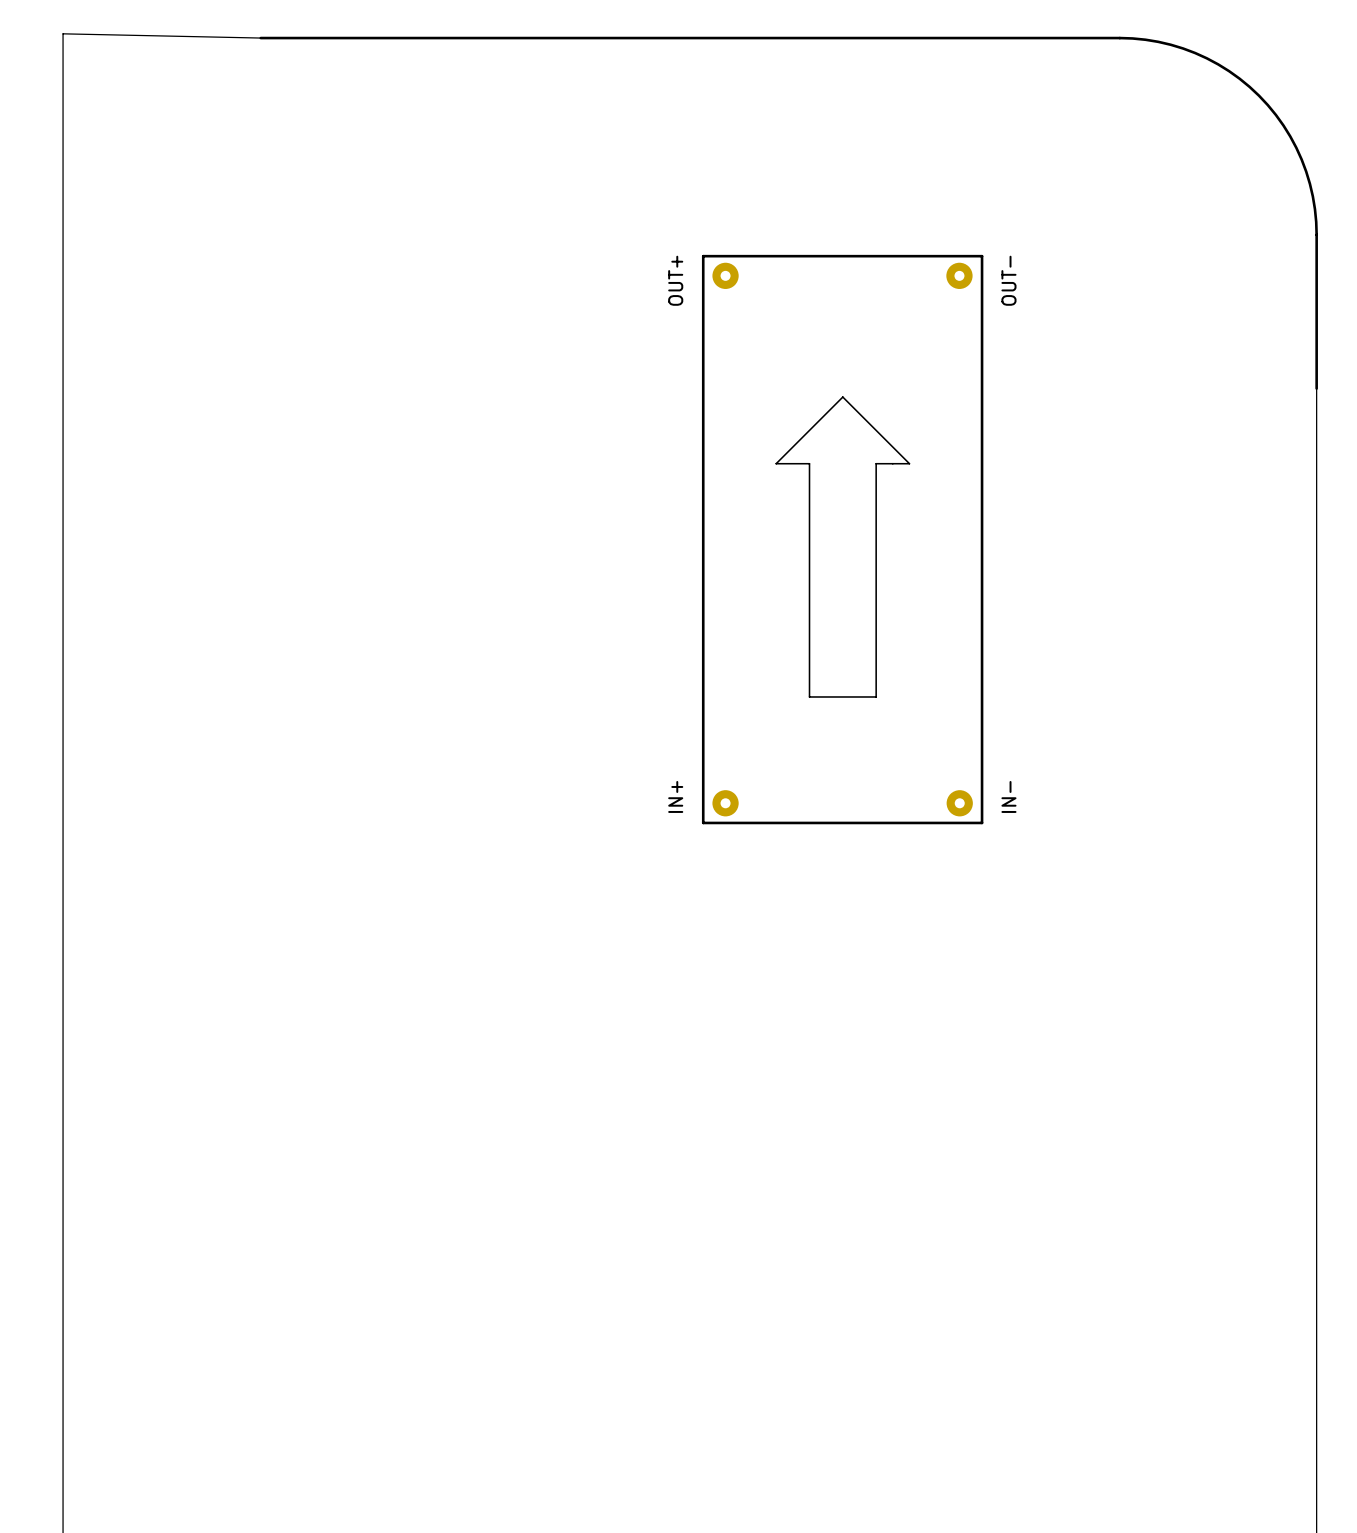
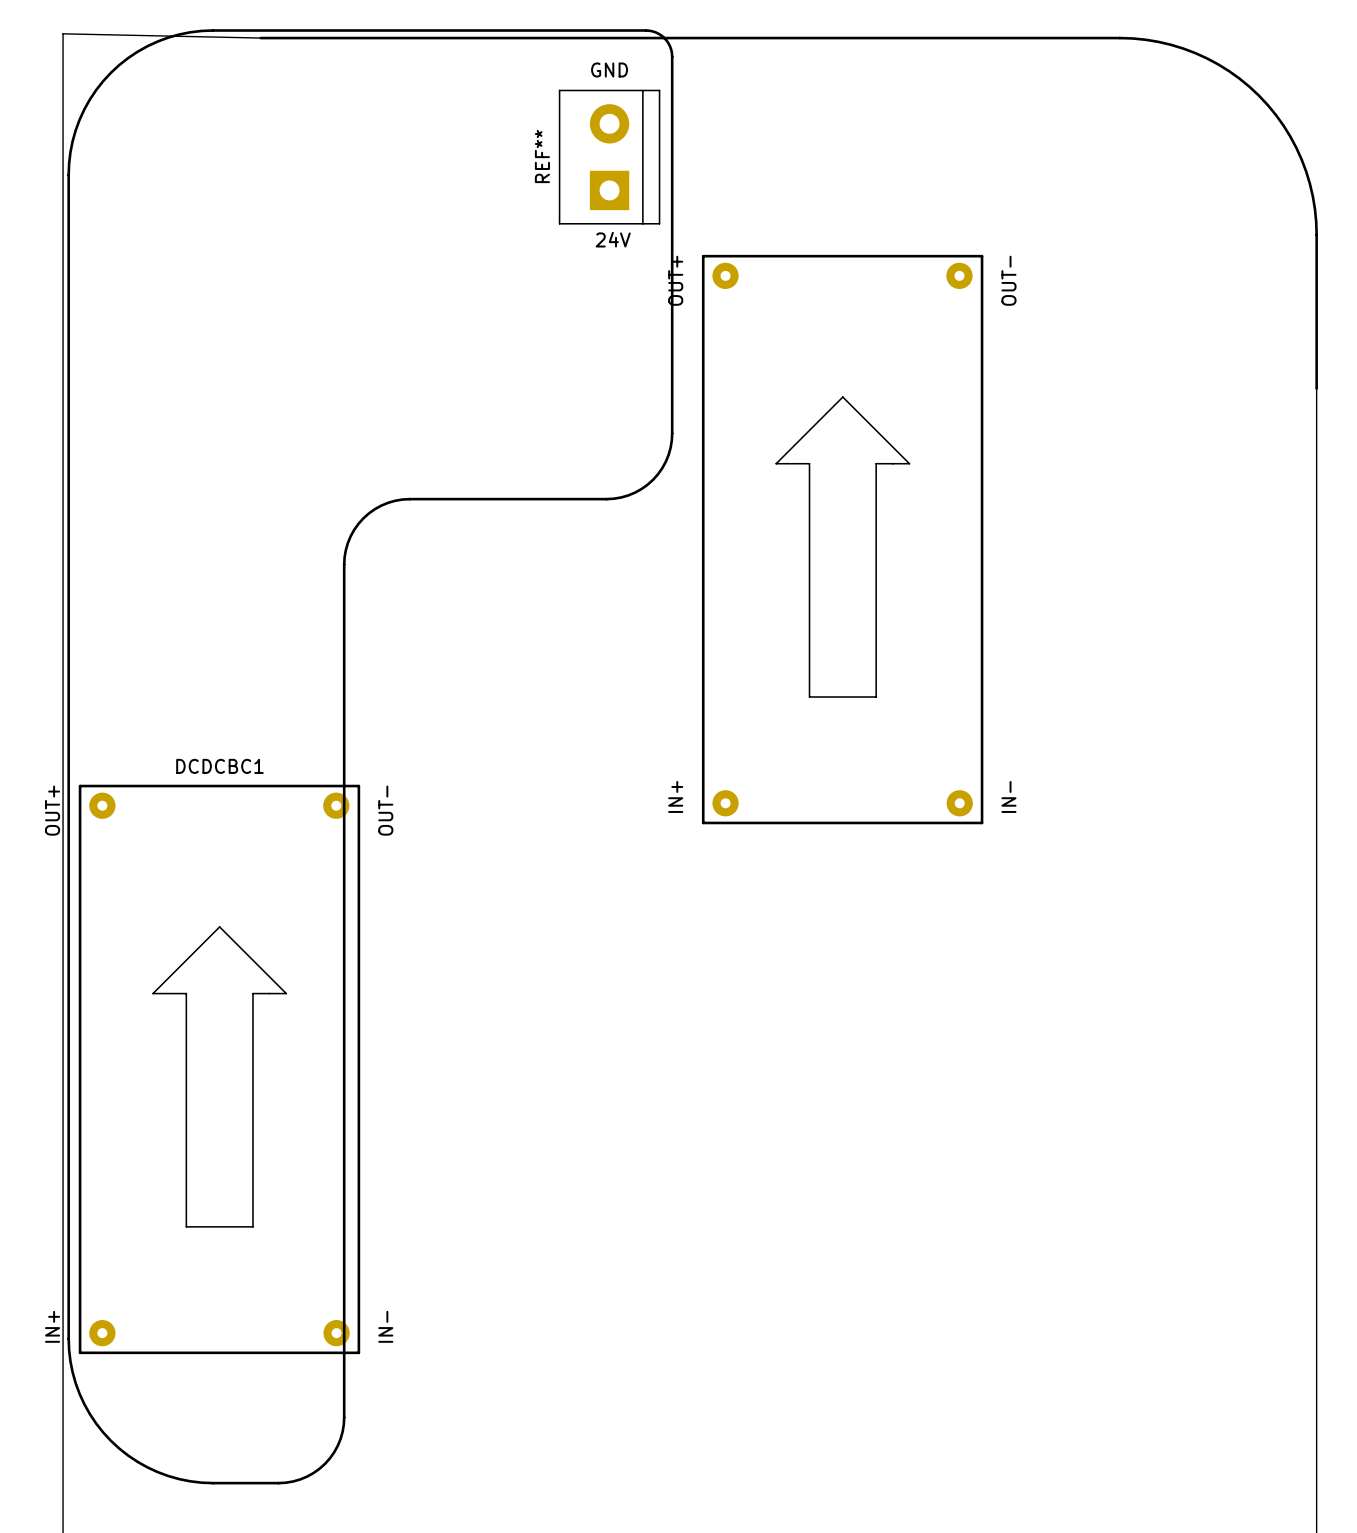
board edge: none -> (212, 30) (645, 30) (655, 32) (664, 38) (670, 46) (672, 56) (672, 433) (670, 448) (662, 468) (652, 479) (641, 489) (628, 495) (613, 498) (409, 499) (395, 500) (374, 509) (363, 518) (354, 529) (345, 550) (344, 564) (343, 1424) (337, 1445) (324, 1463) (313, 1473) (300, 1479) (278, 1483) (190, 1481) (168, 1476) (137, 1461) (110, 1440) (89, 1414) (75, 1383) (69, 1350) (69, 163) (72, 141) (84, 109) (96, 89) (119, 65) (137, 51) (157, 41) (190, 32) (212, 30)
text: none -> GND (609, 70)
REF**: none -> (609, 157)
text: none -> 24V (613, 239)
DCDCBC1: none -> (219, 1069)

